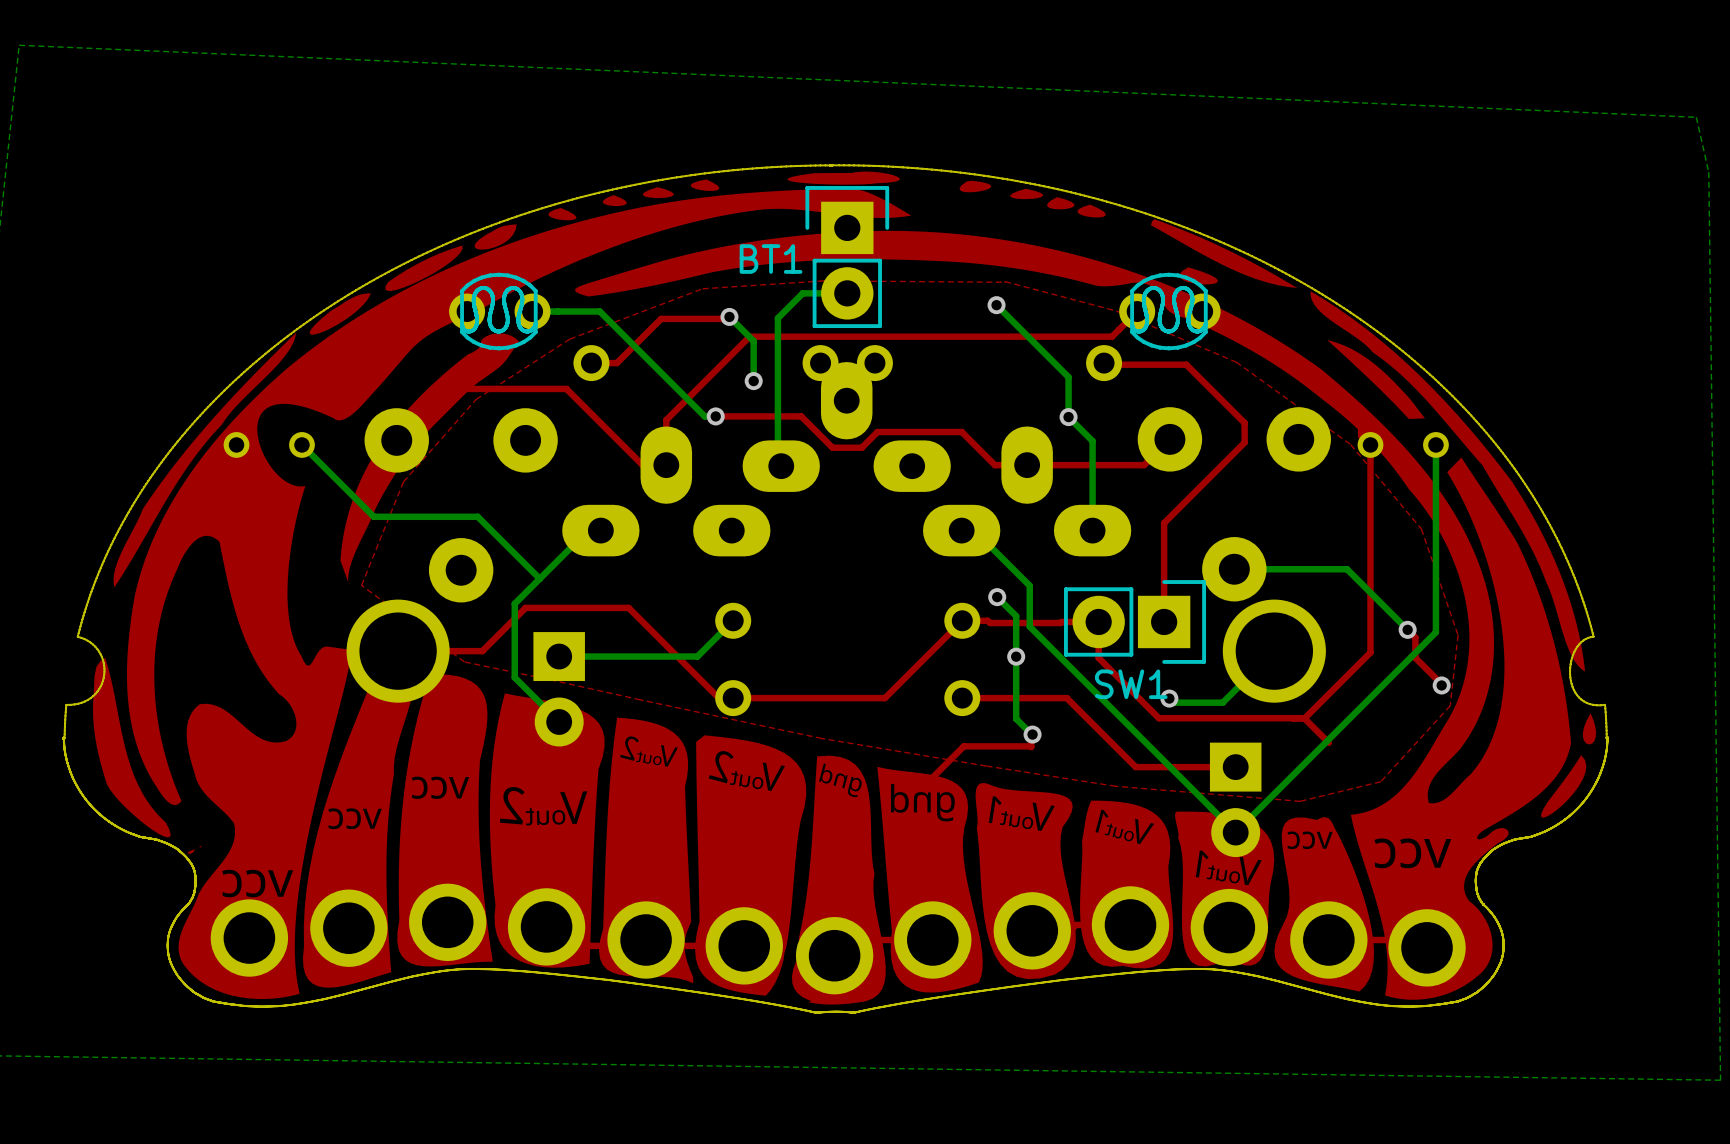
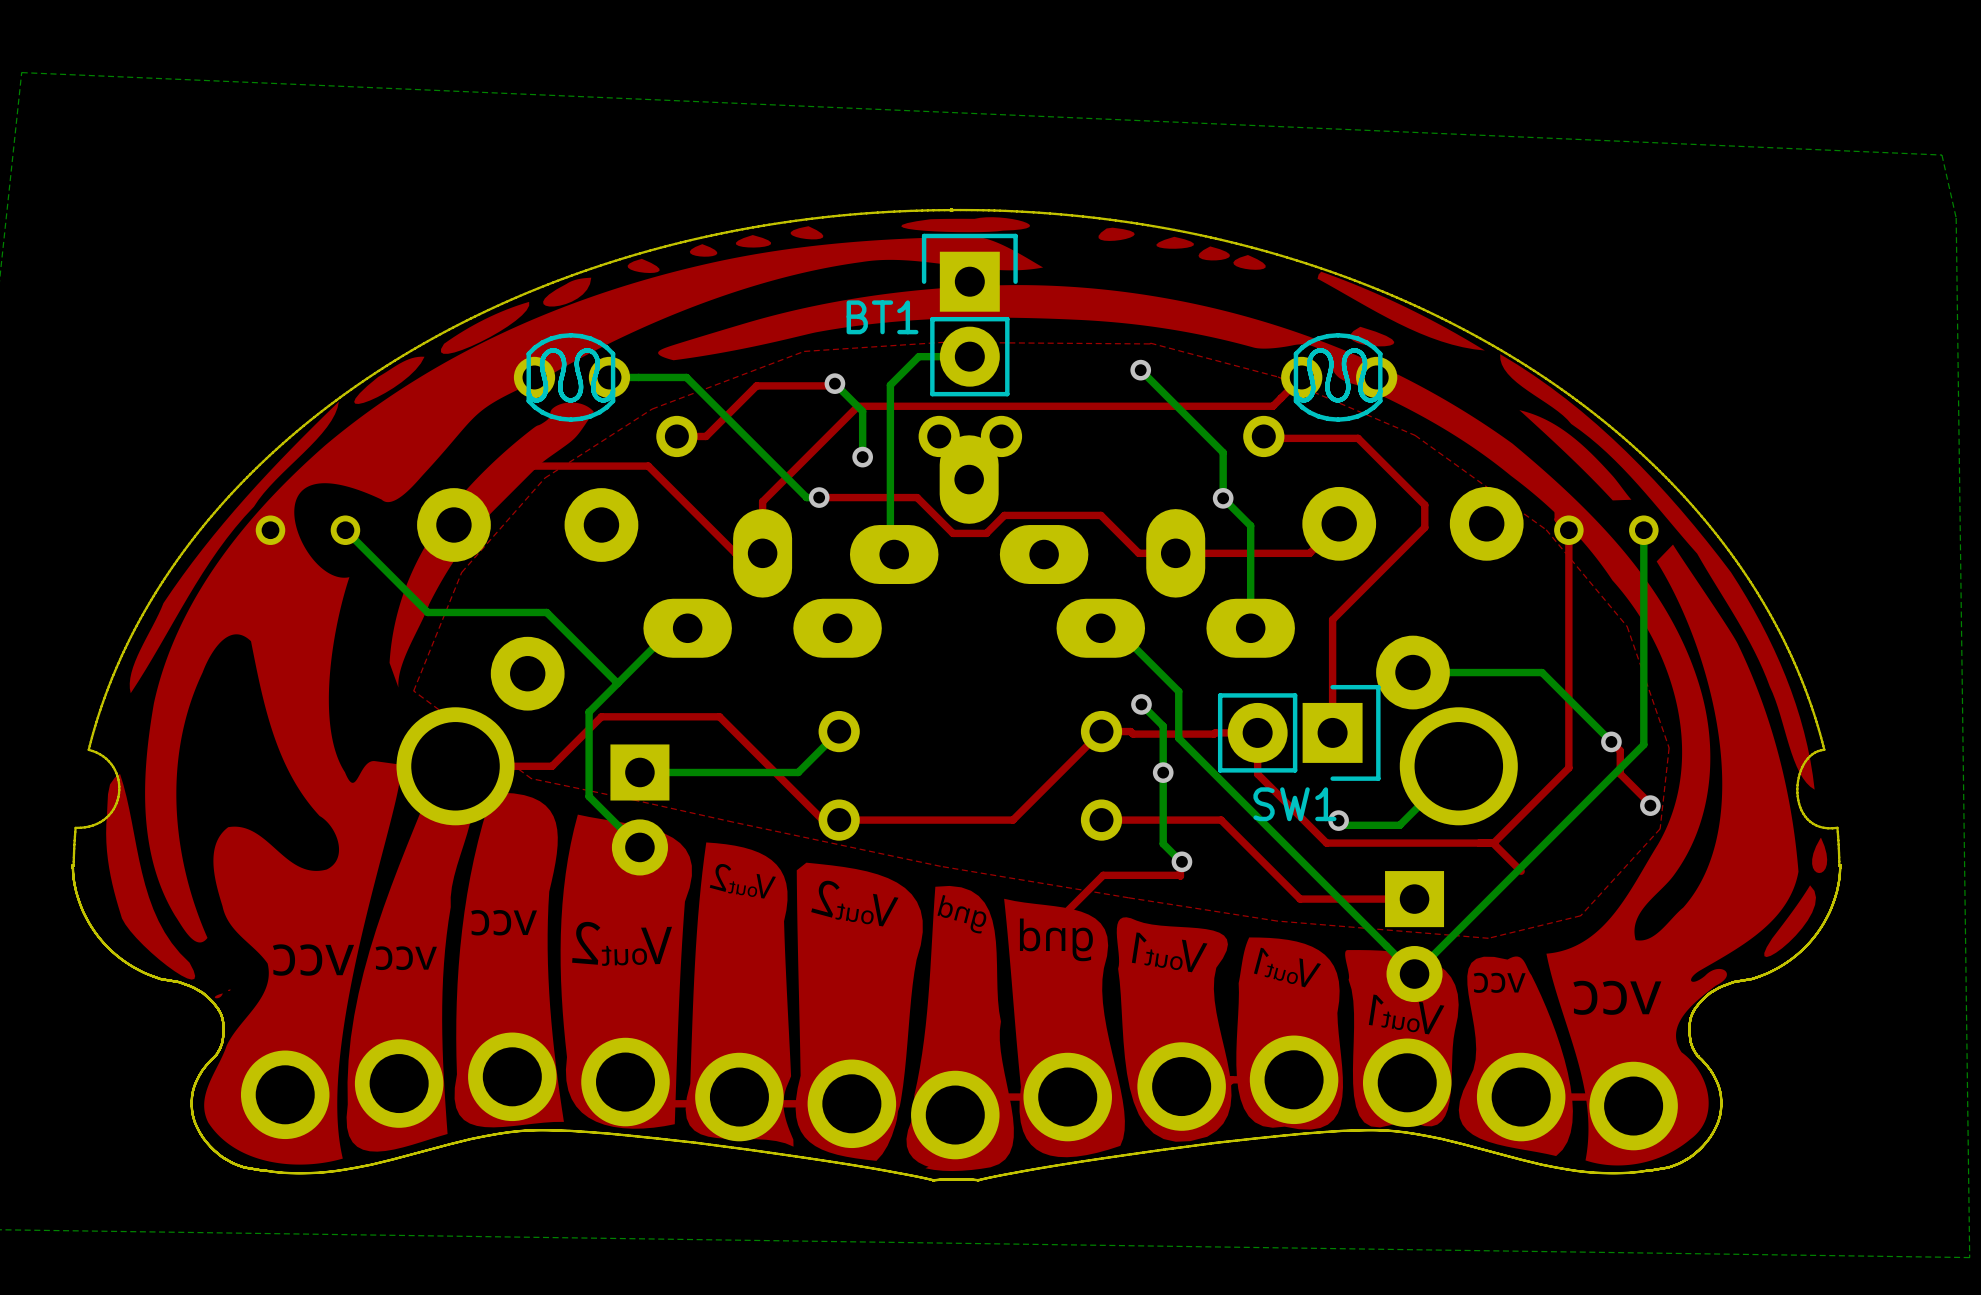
drawing shape: [62, 164, 1609, 1014] -> [71, 208, 1842, 1182]

